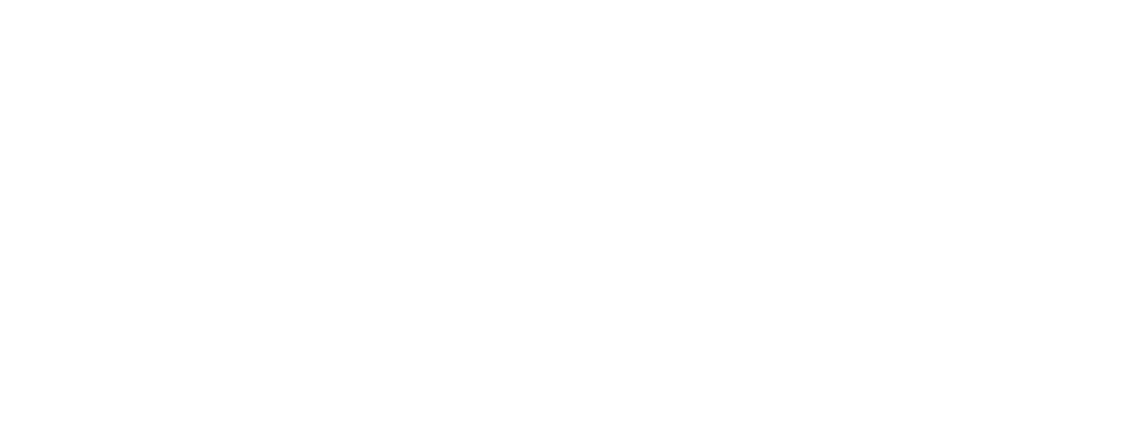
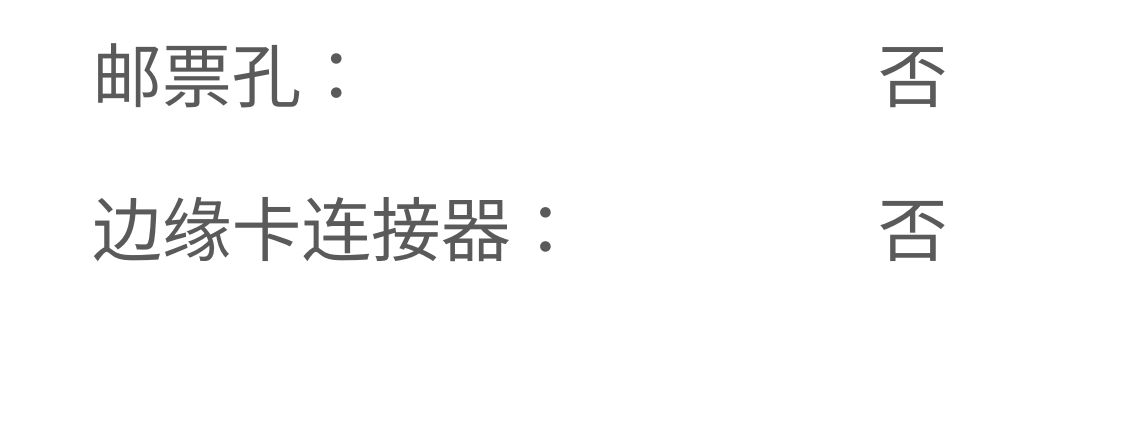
text: none -> 邮票孔： (219, 75)
text: none -> 否 (912, 77)
text: none -> 边缘卡连接器： (322, 229)
text: none -> 否 (912, 230)

